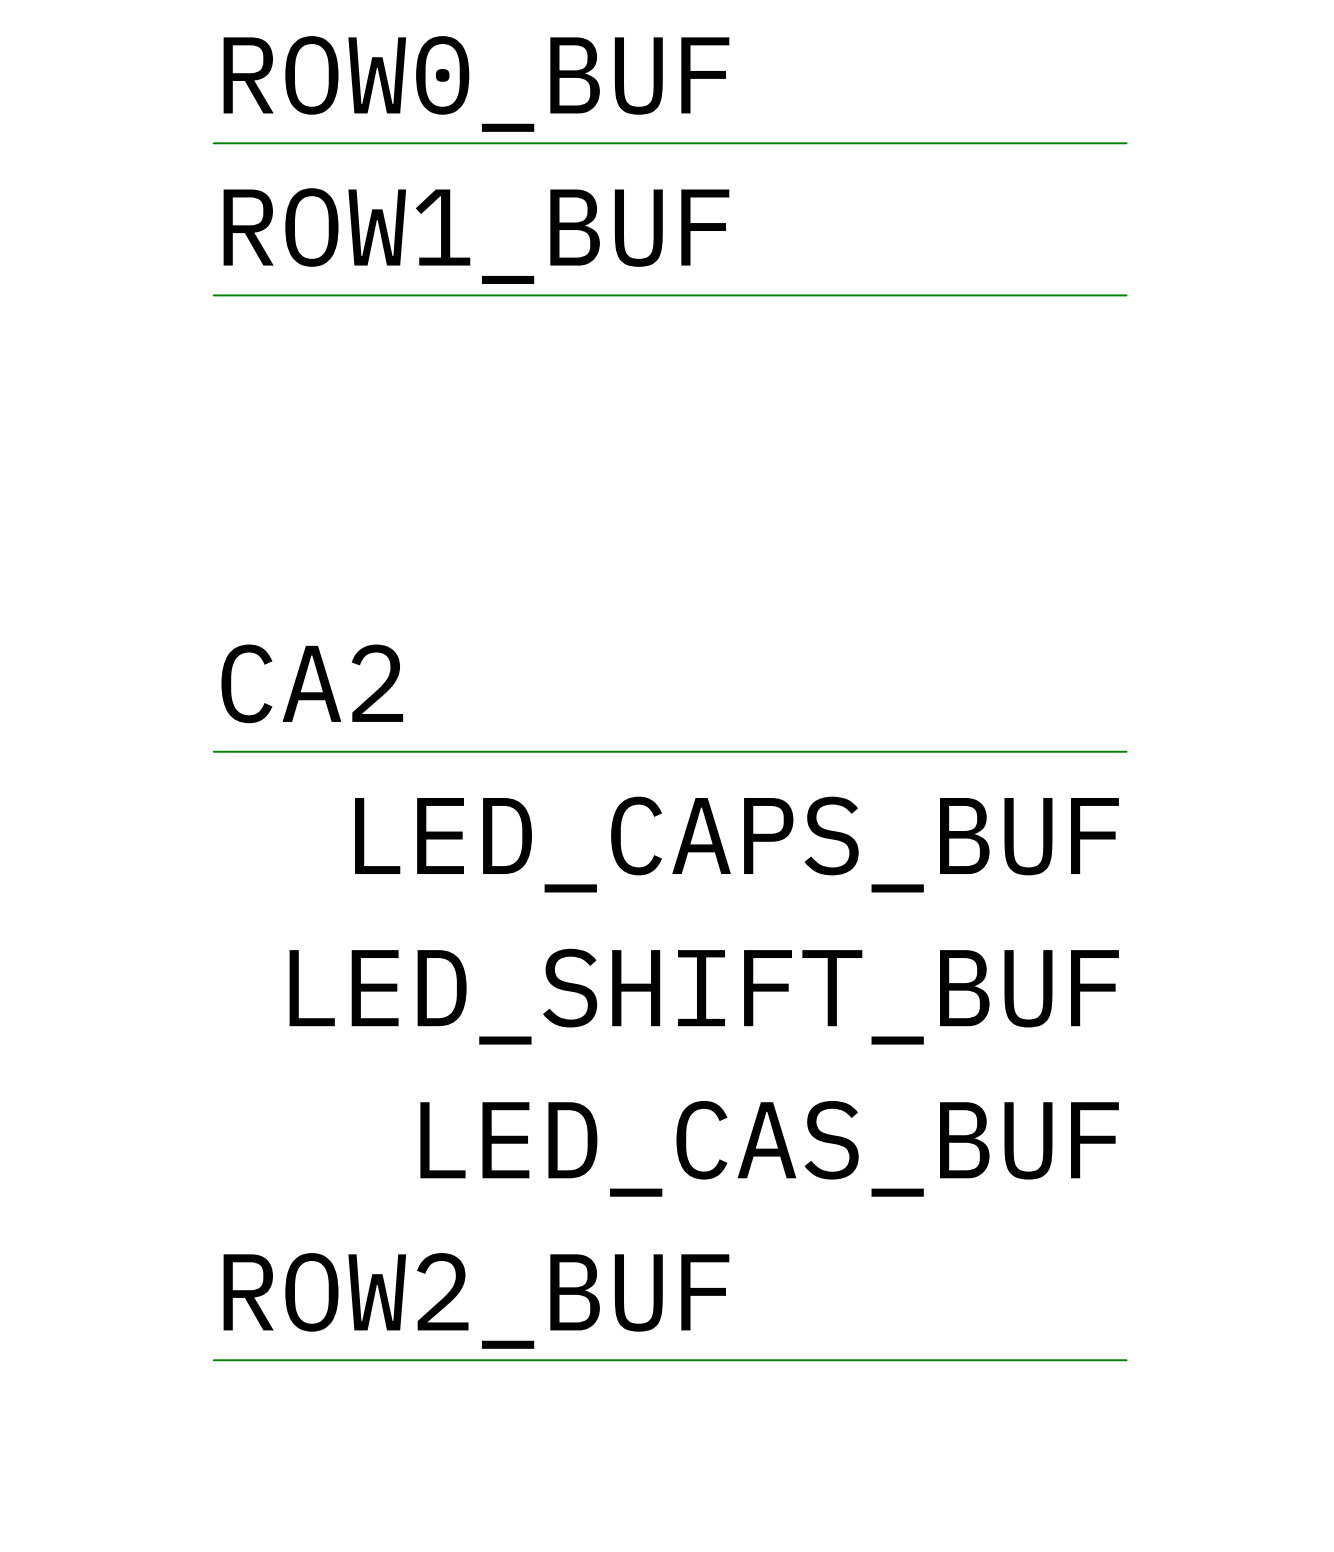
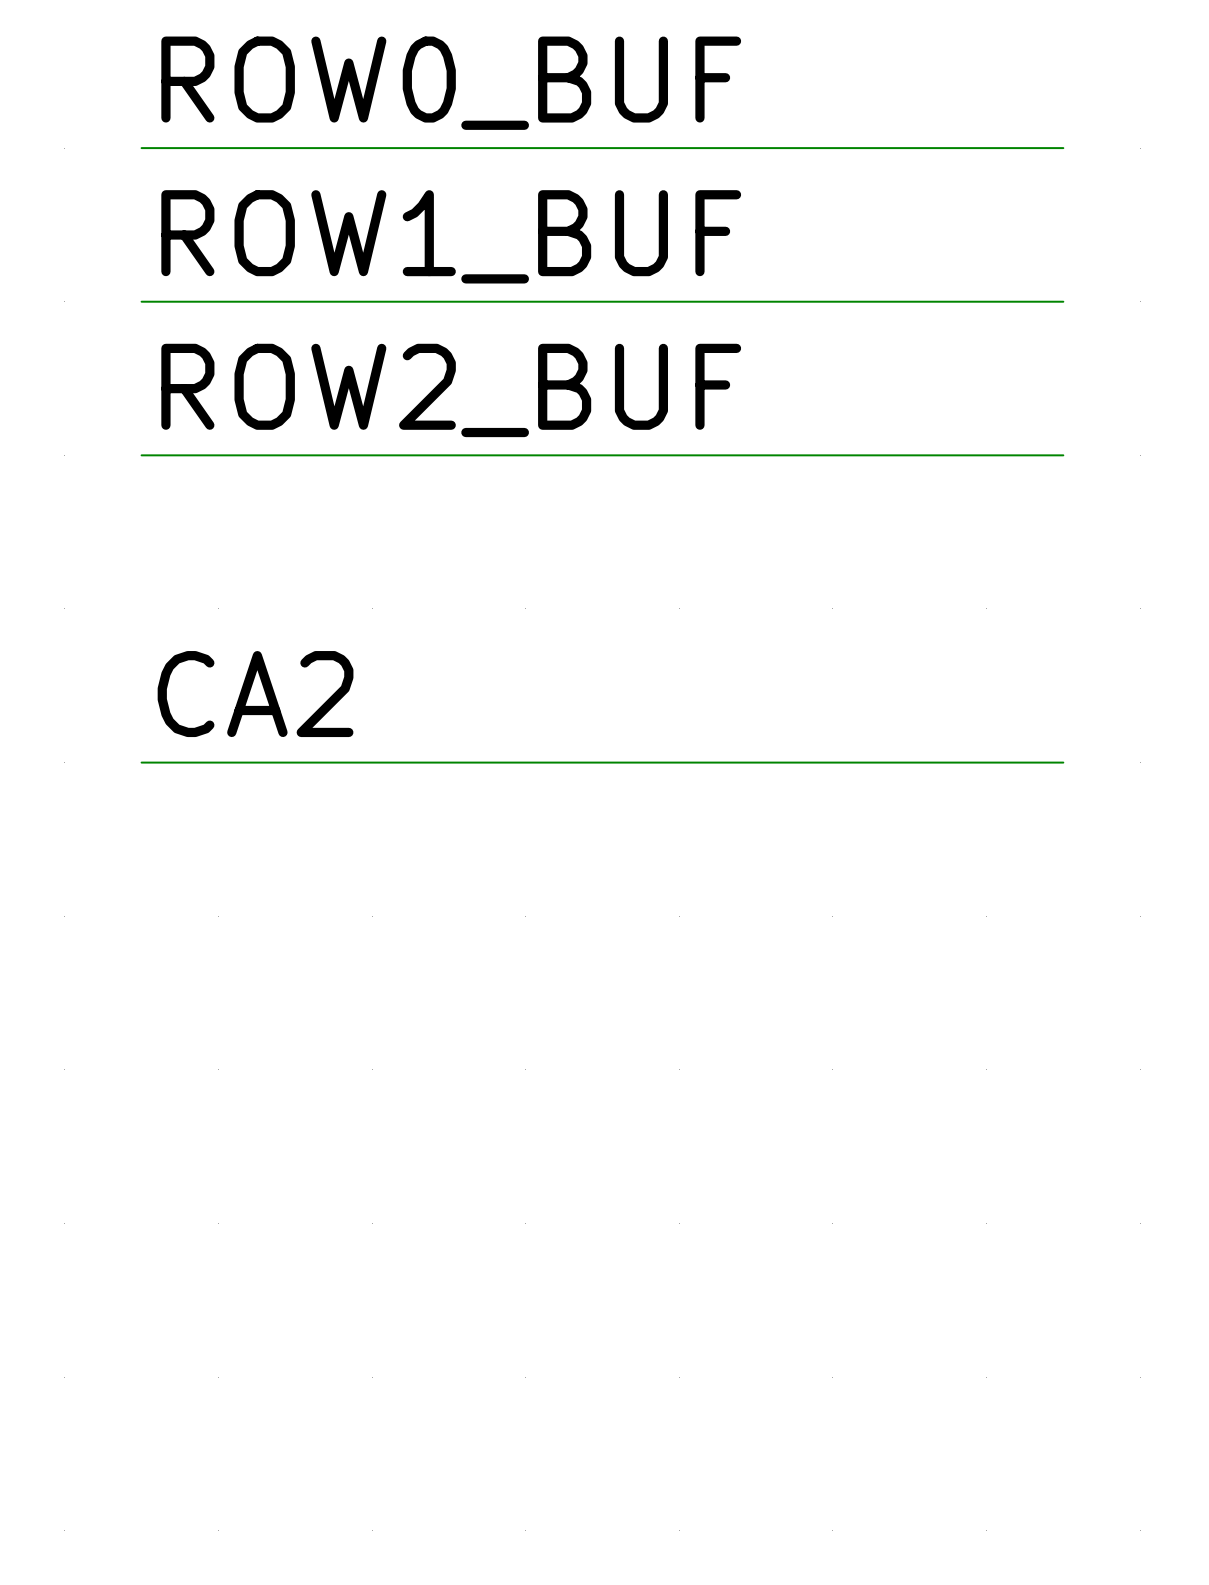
label: LED_CAPS_BUF (736, 844) -> none
label: LED_SHIFT_BUF (704, 996) -> none
label: LED_CAS_BUF (769, 1148) -> none
label position: ROW2_BUF (476, 1300) -> ROW2_BUF (451, 390)
wire: (213, 1360) (1126, 1360) -> (141, 455) (1063, 455)

